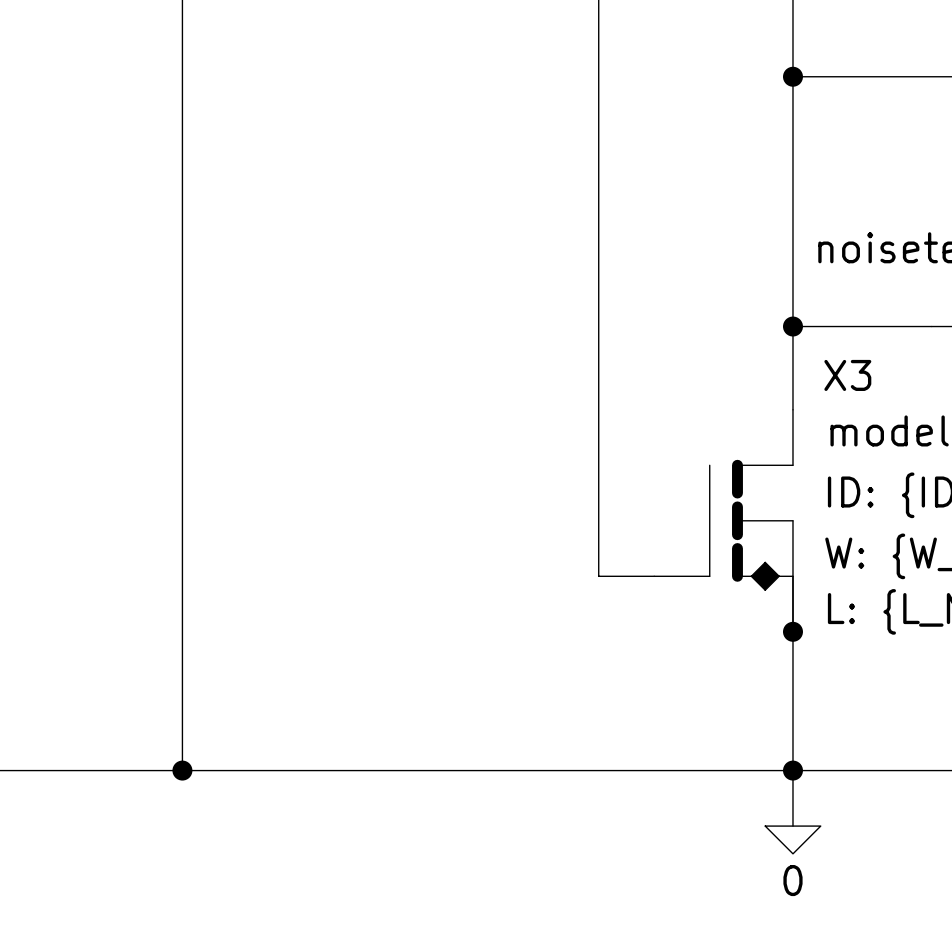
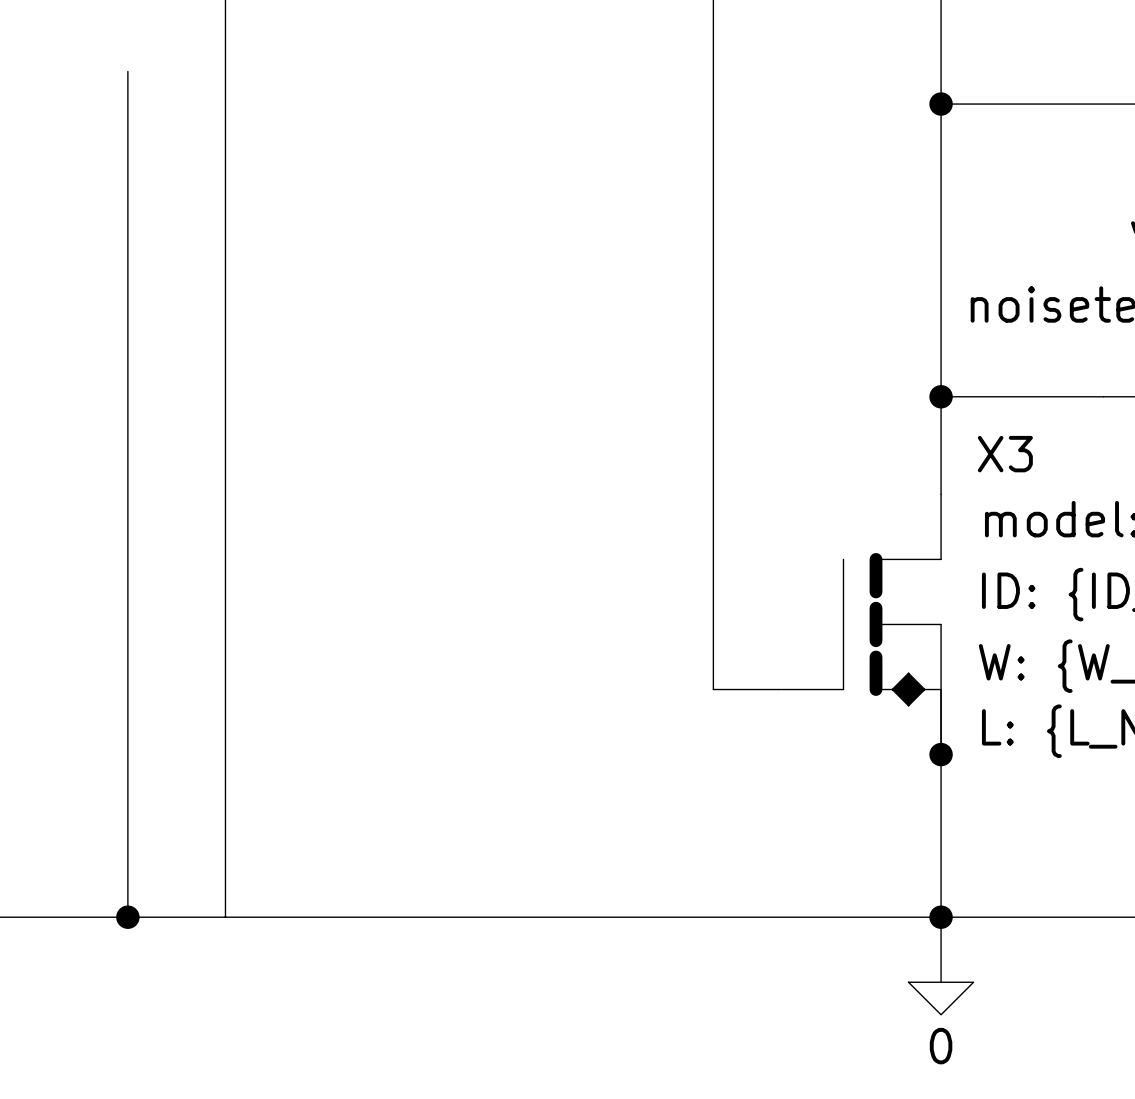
wire: none -> (127, 71) (127, 917)
junction position: (182, 770) -> (127, 917)

